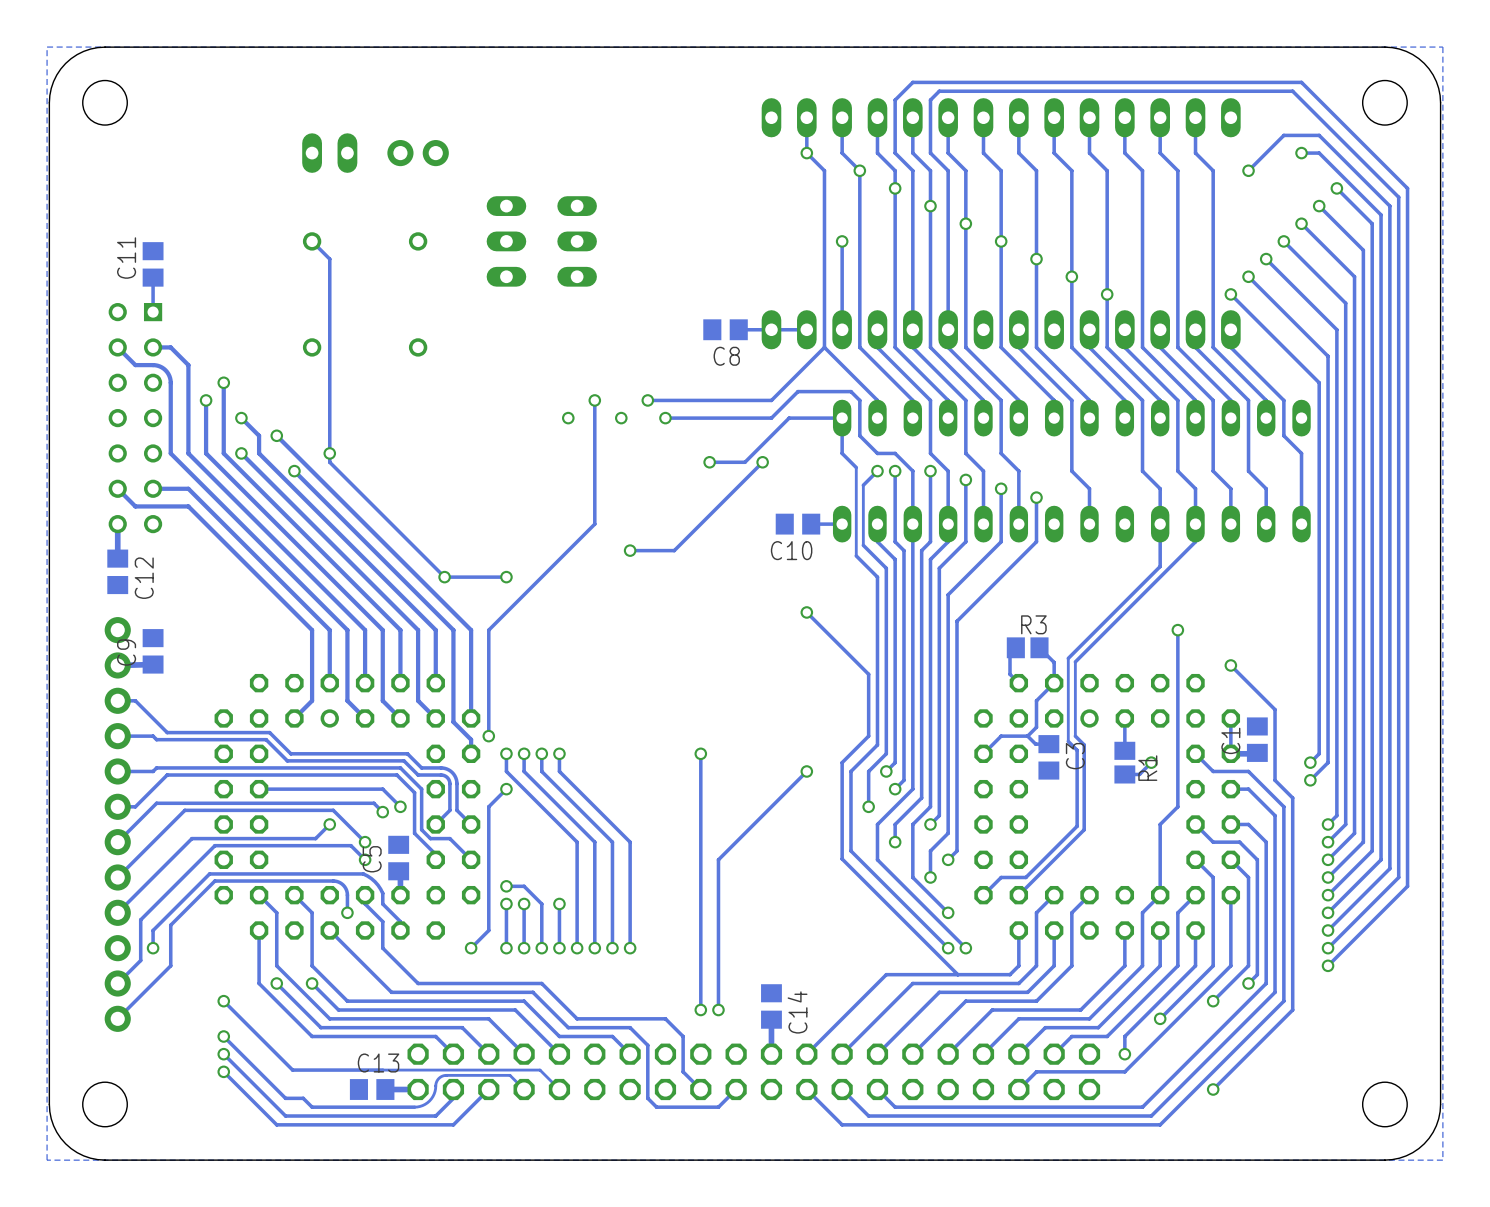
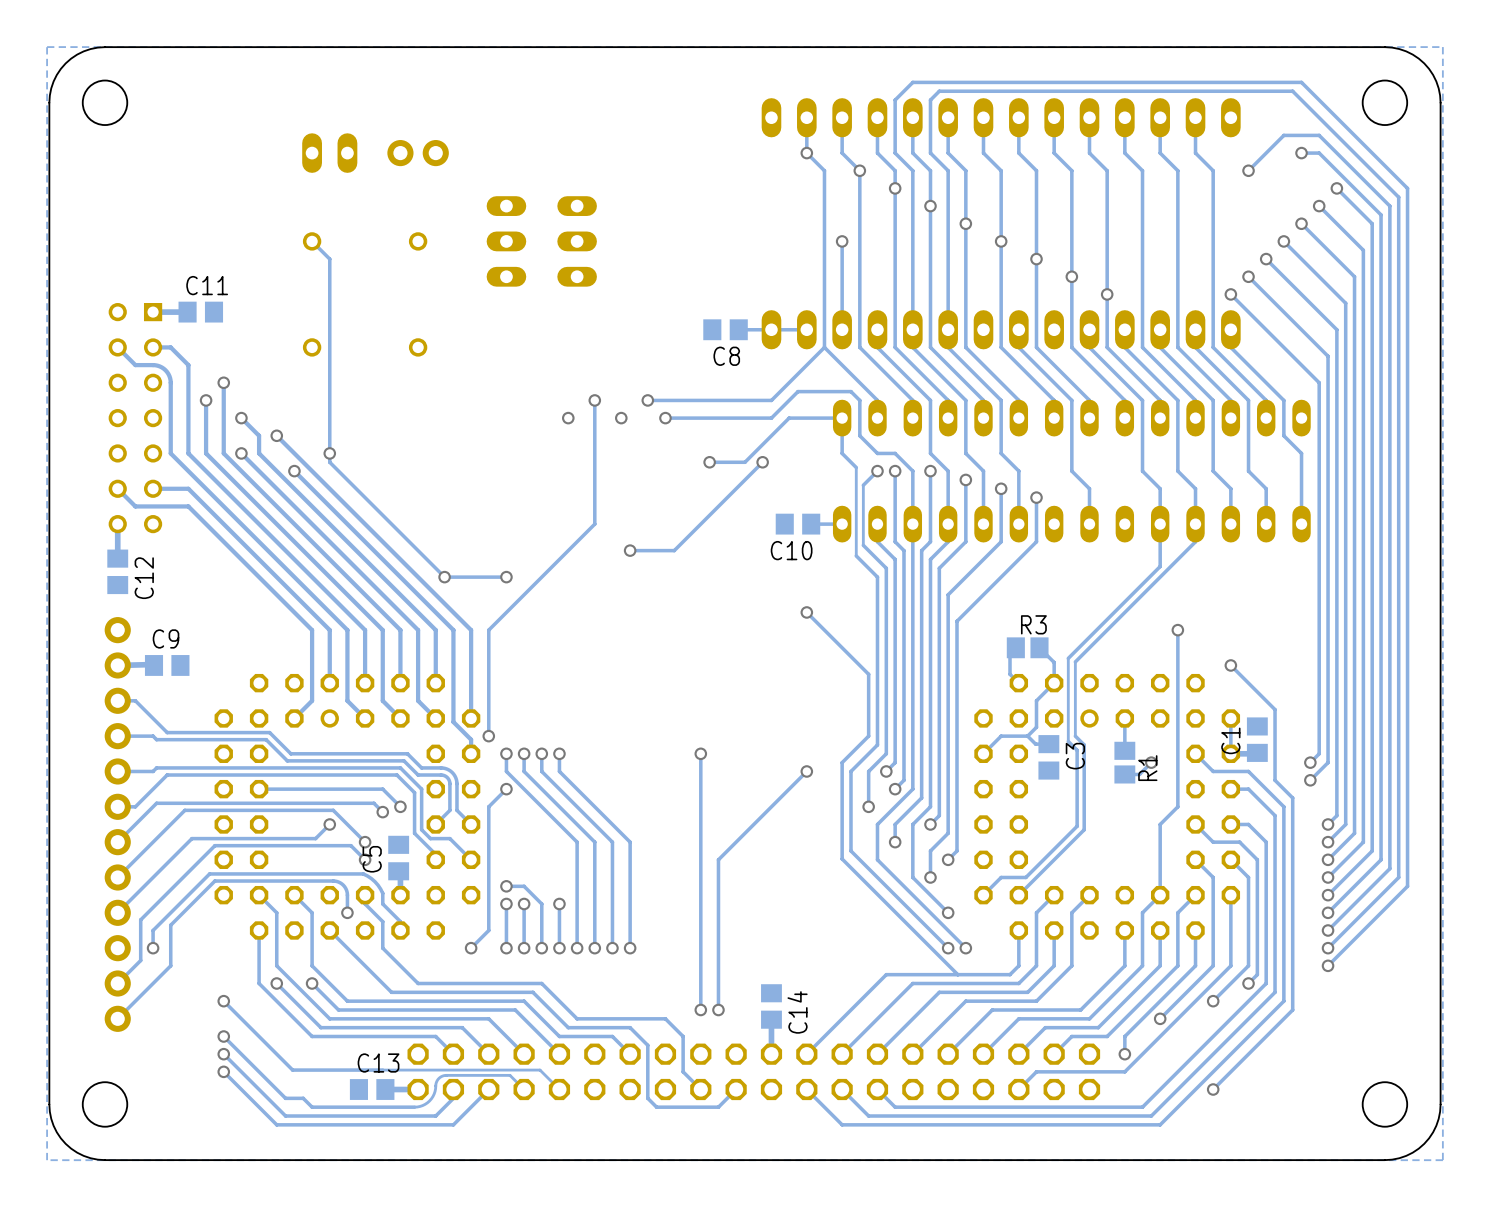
C11 rotation: 0° (153, 264) -> 90° clockwise (200, 312)
C11 position: (153, 264) -> (200, 312)
track: (153, 277) (153, 312) -> (187, 312) (153, 312)
C9 rotation: 0° (153, 651) -> 90° clockwise (167, 665)

